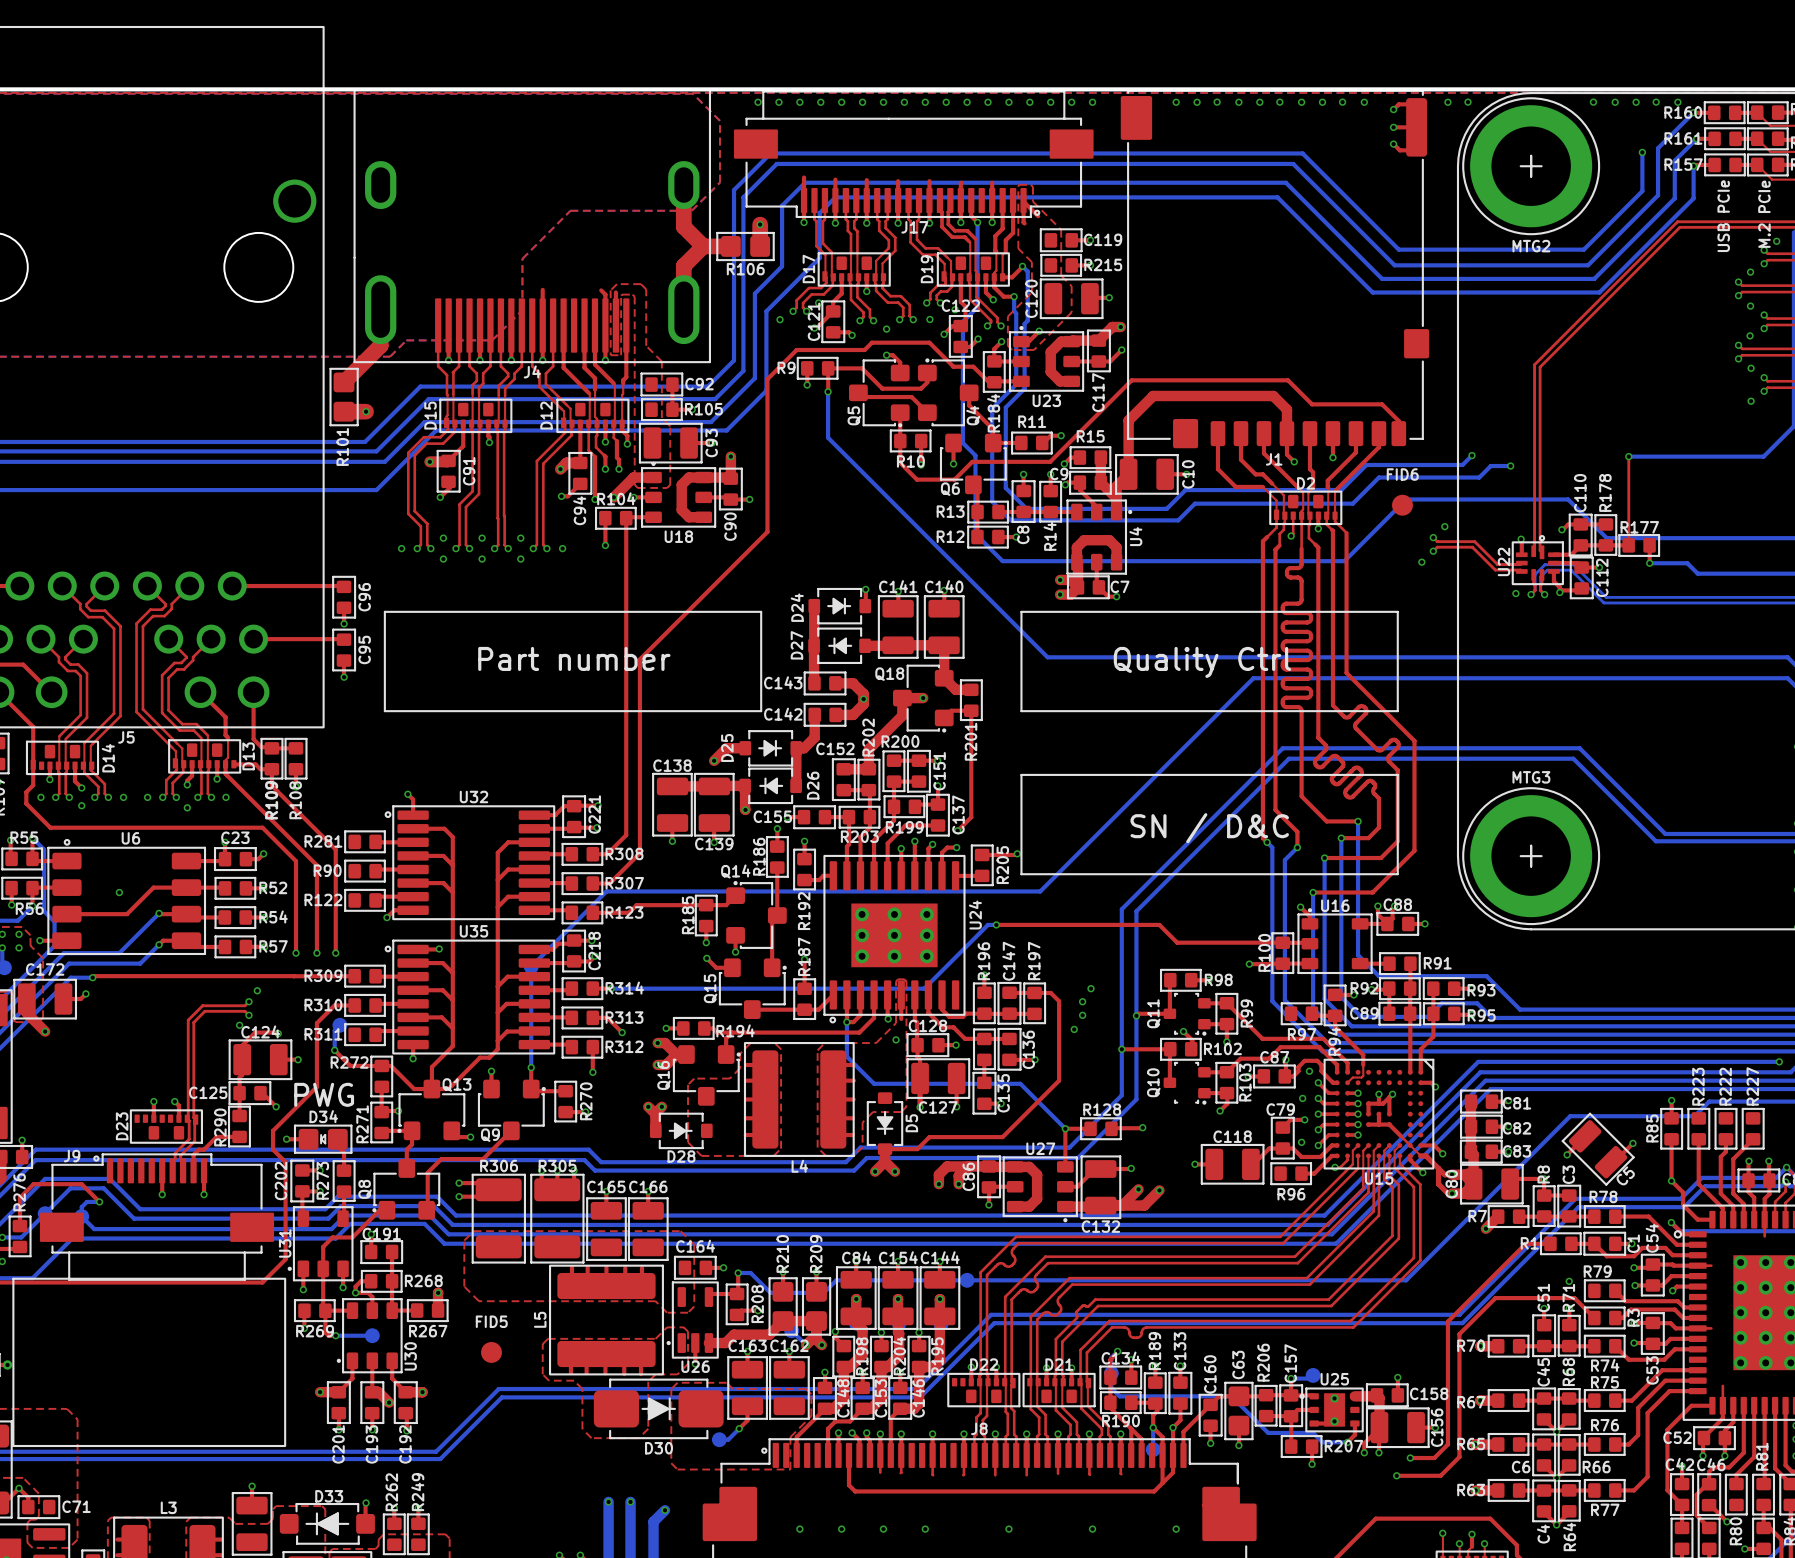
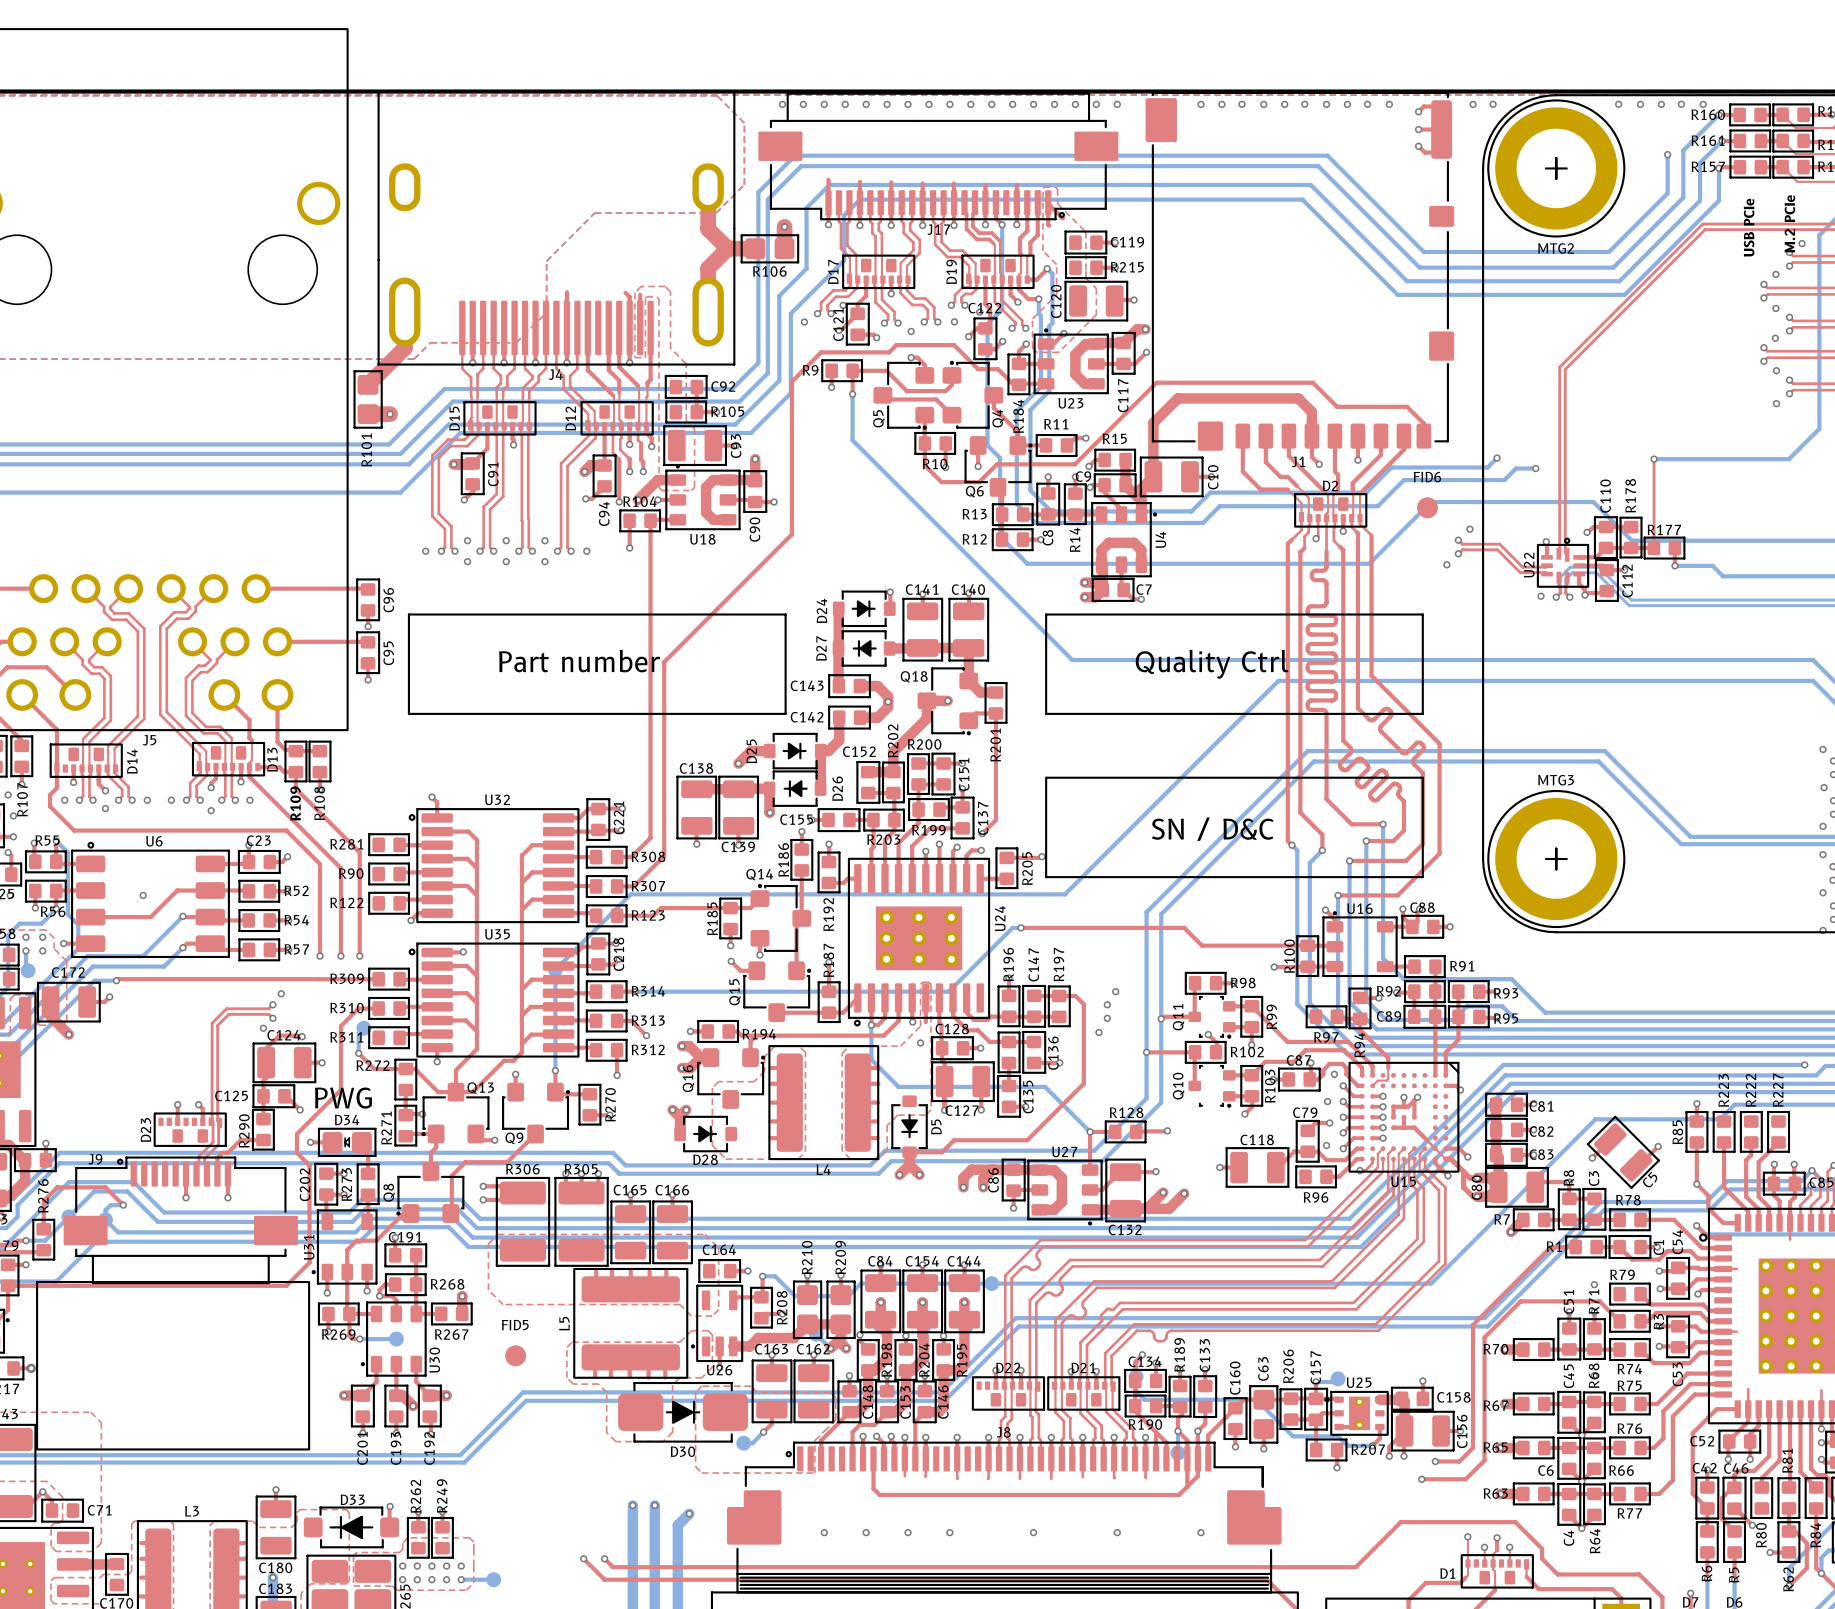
J1 footprint: [1120, 89, 1430, 449] -> [1145, 91, 1455, 451]

